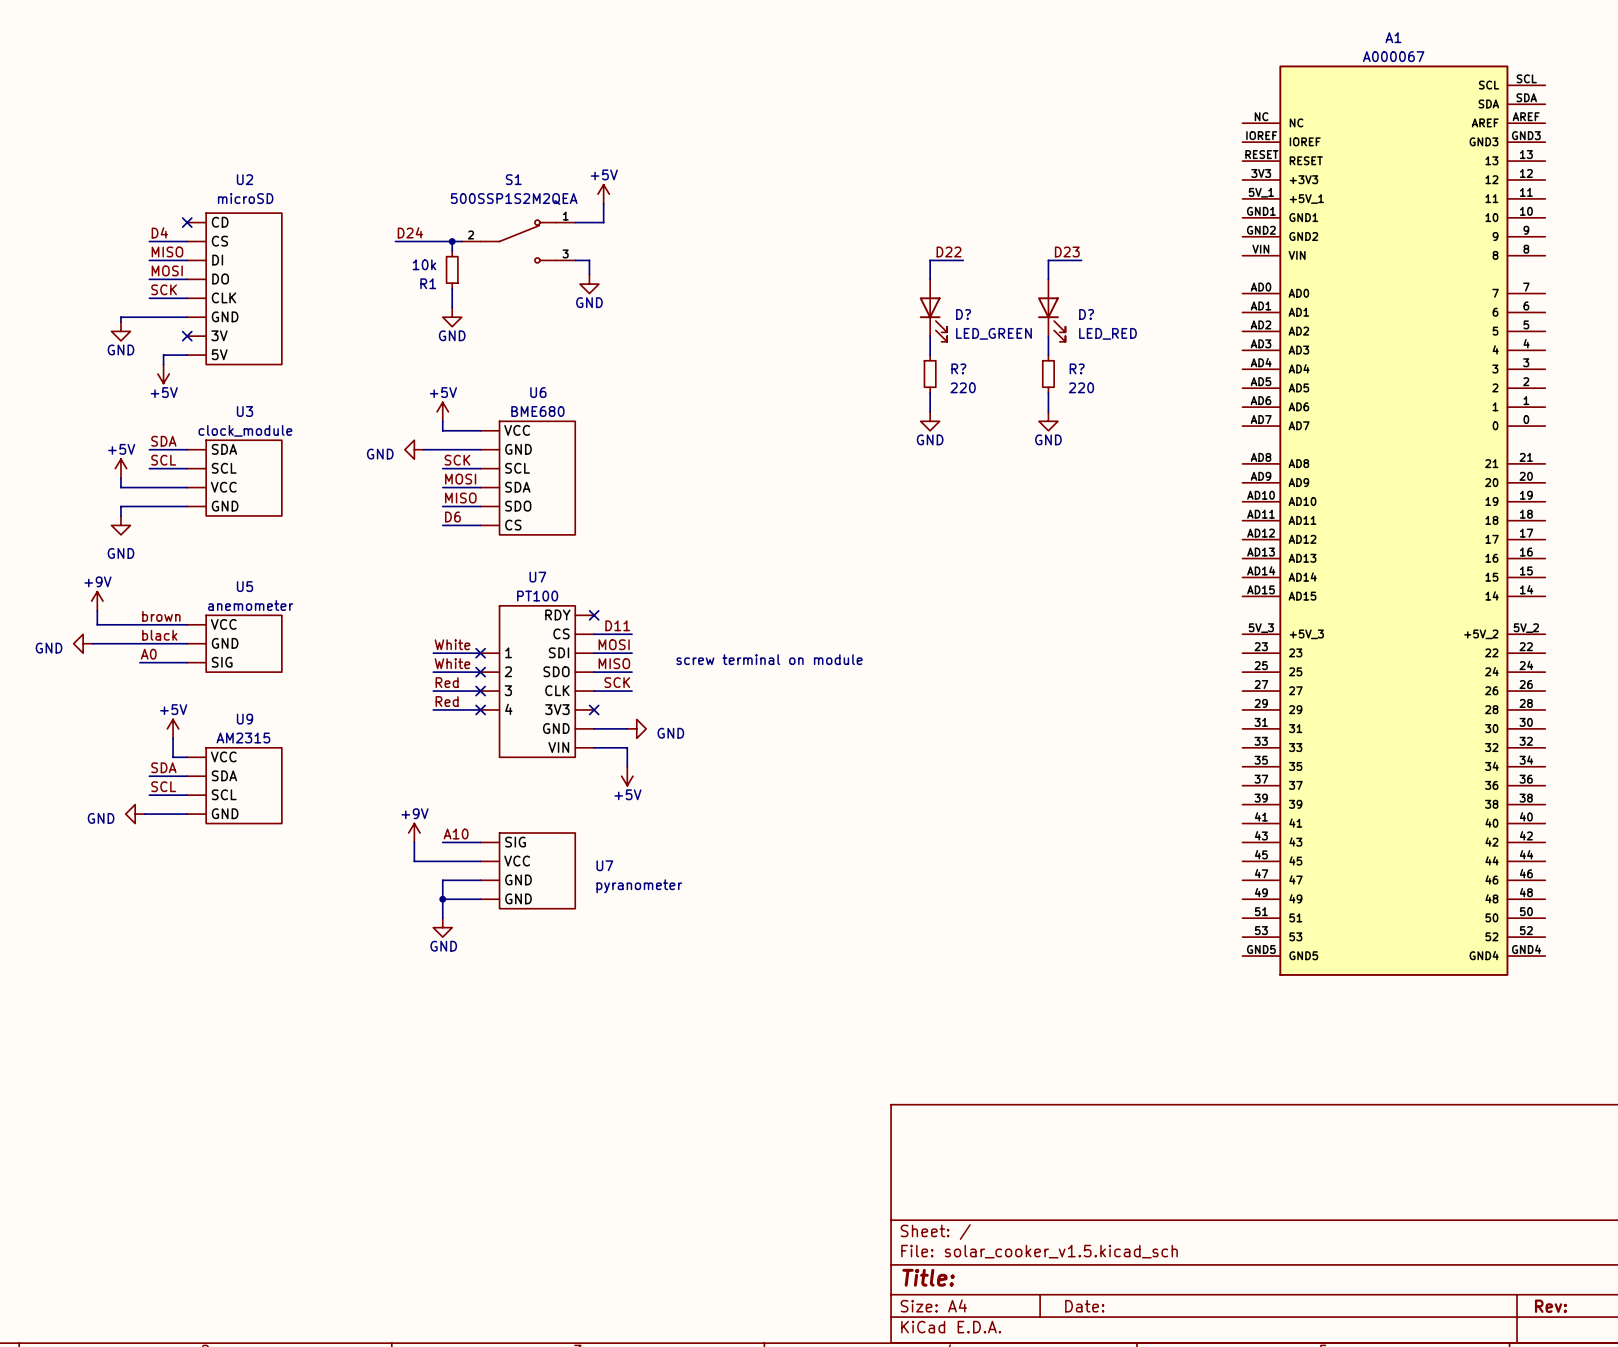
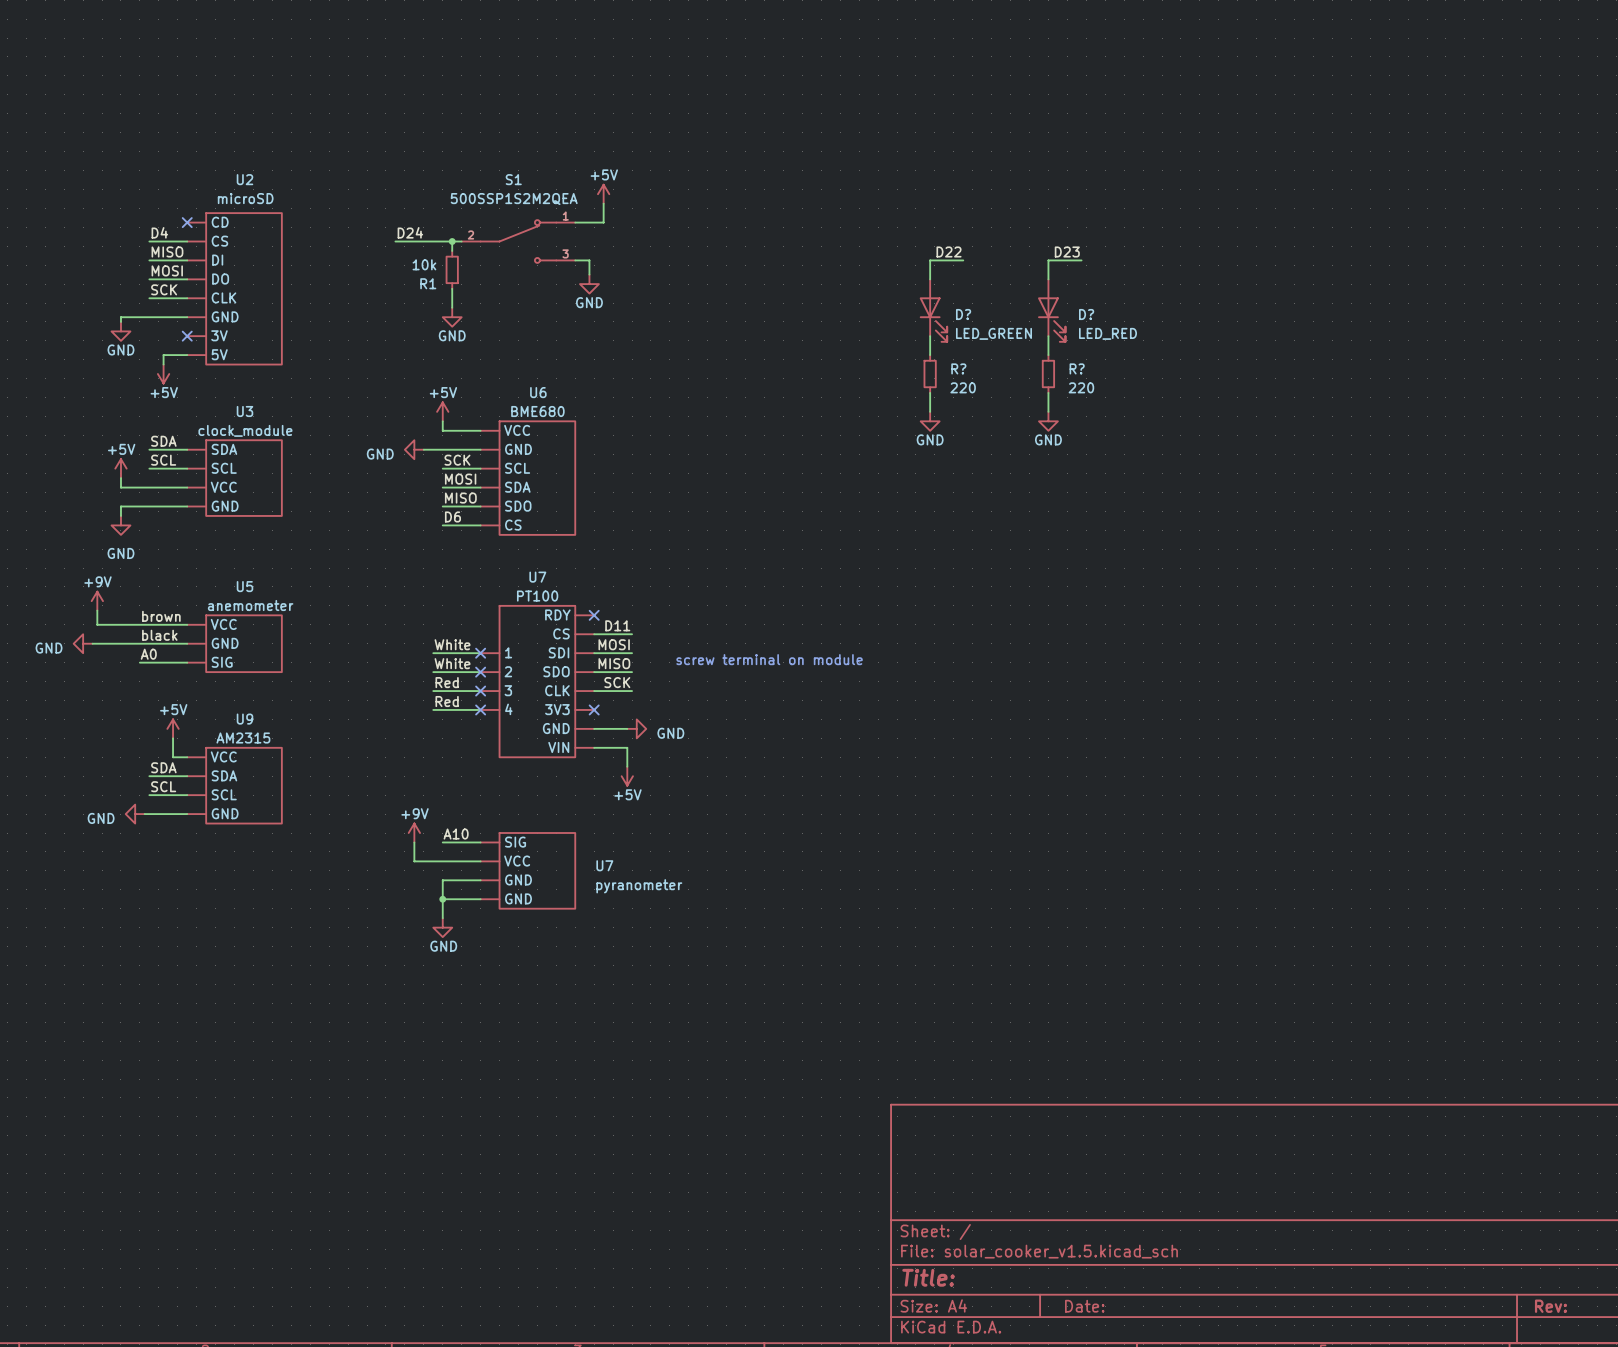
A1: A000067 (1393, 520) -> none

